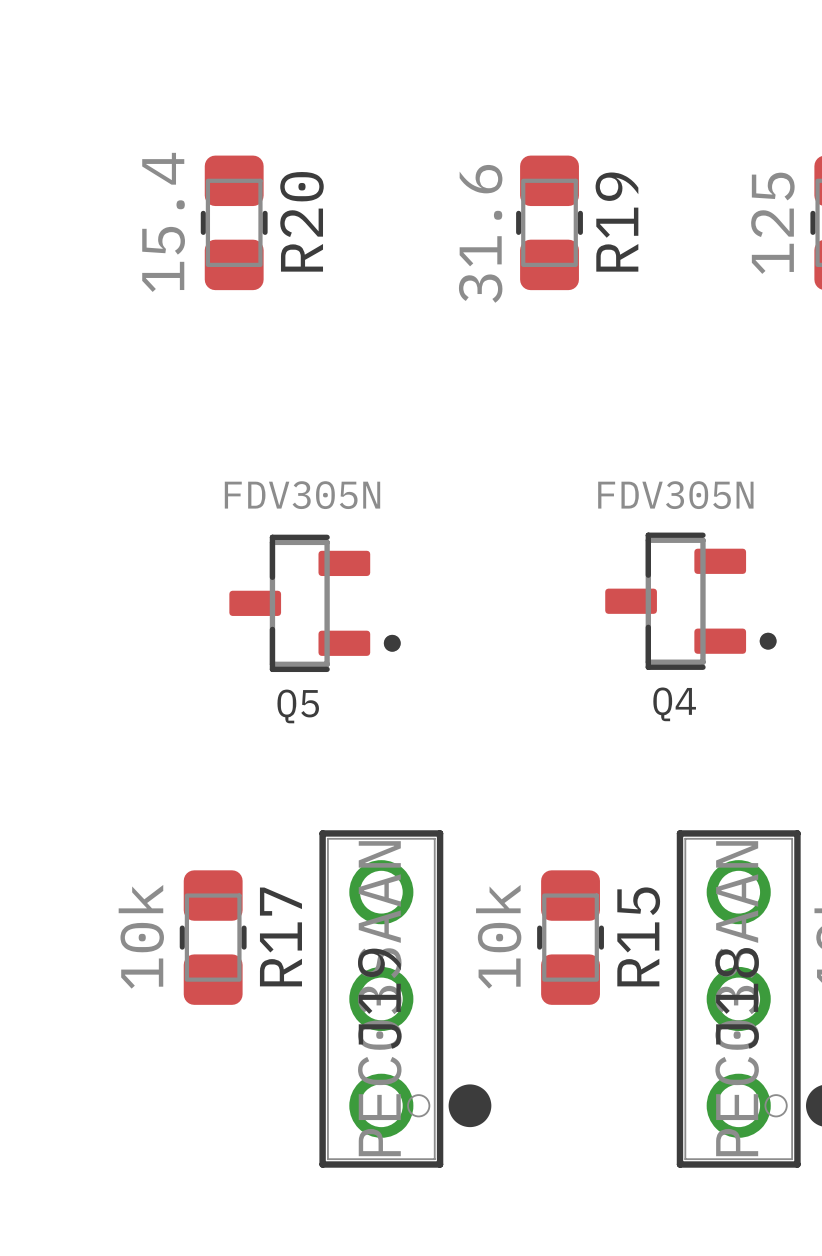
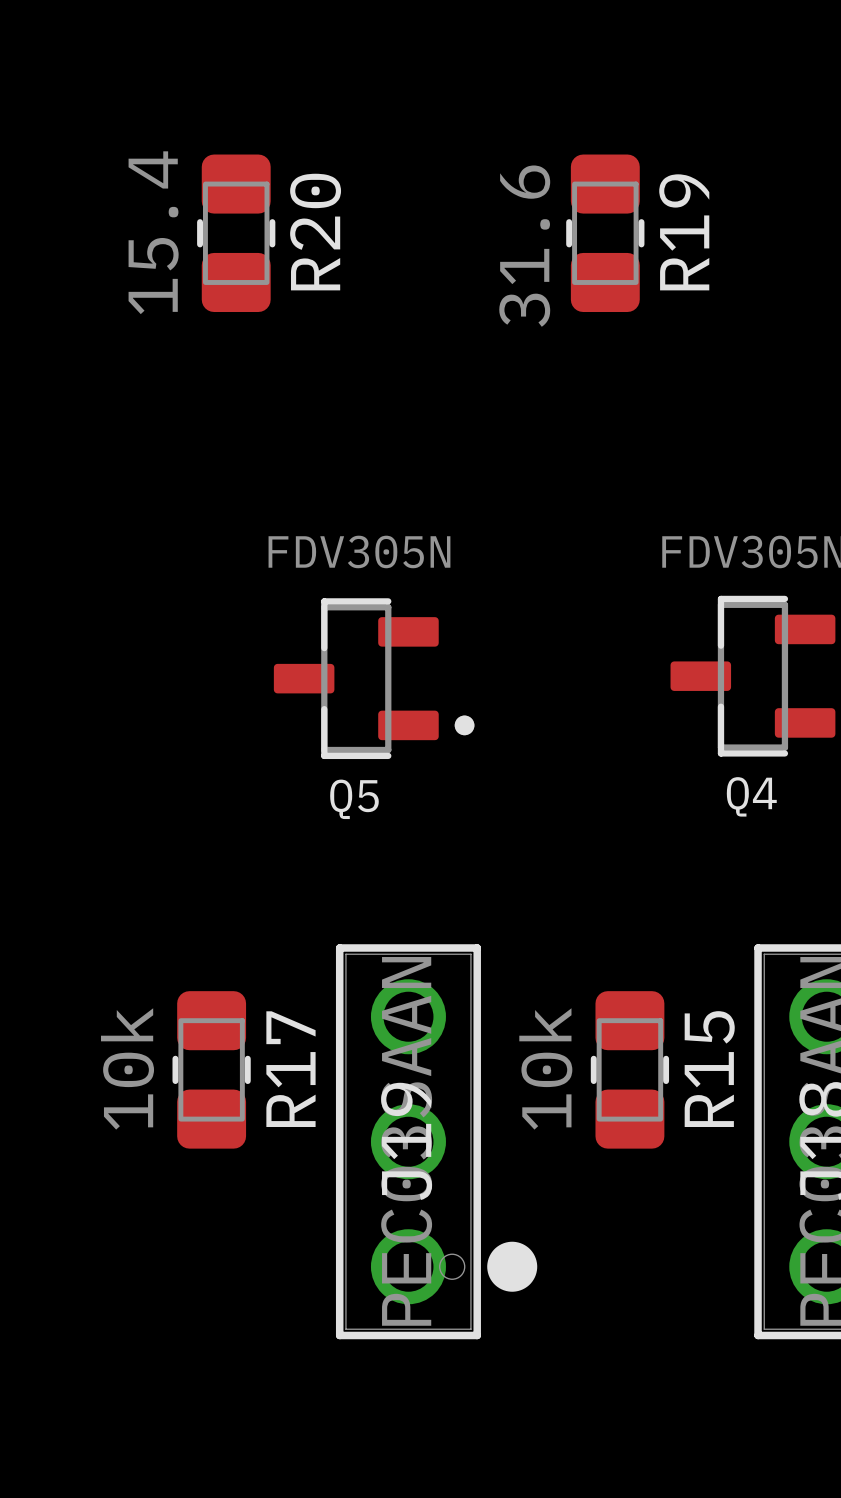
Q5 position: (315, 603) -> (374, 678)

